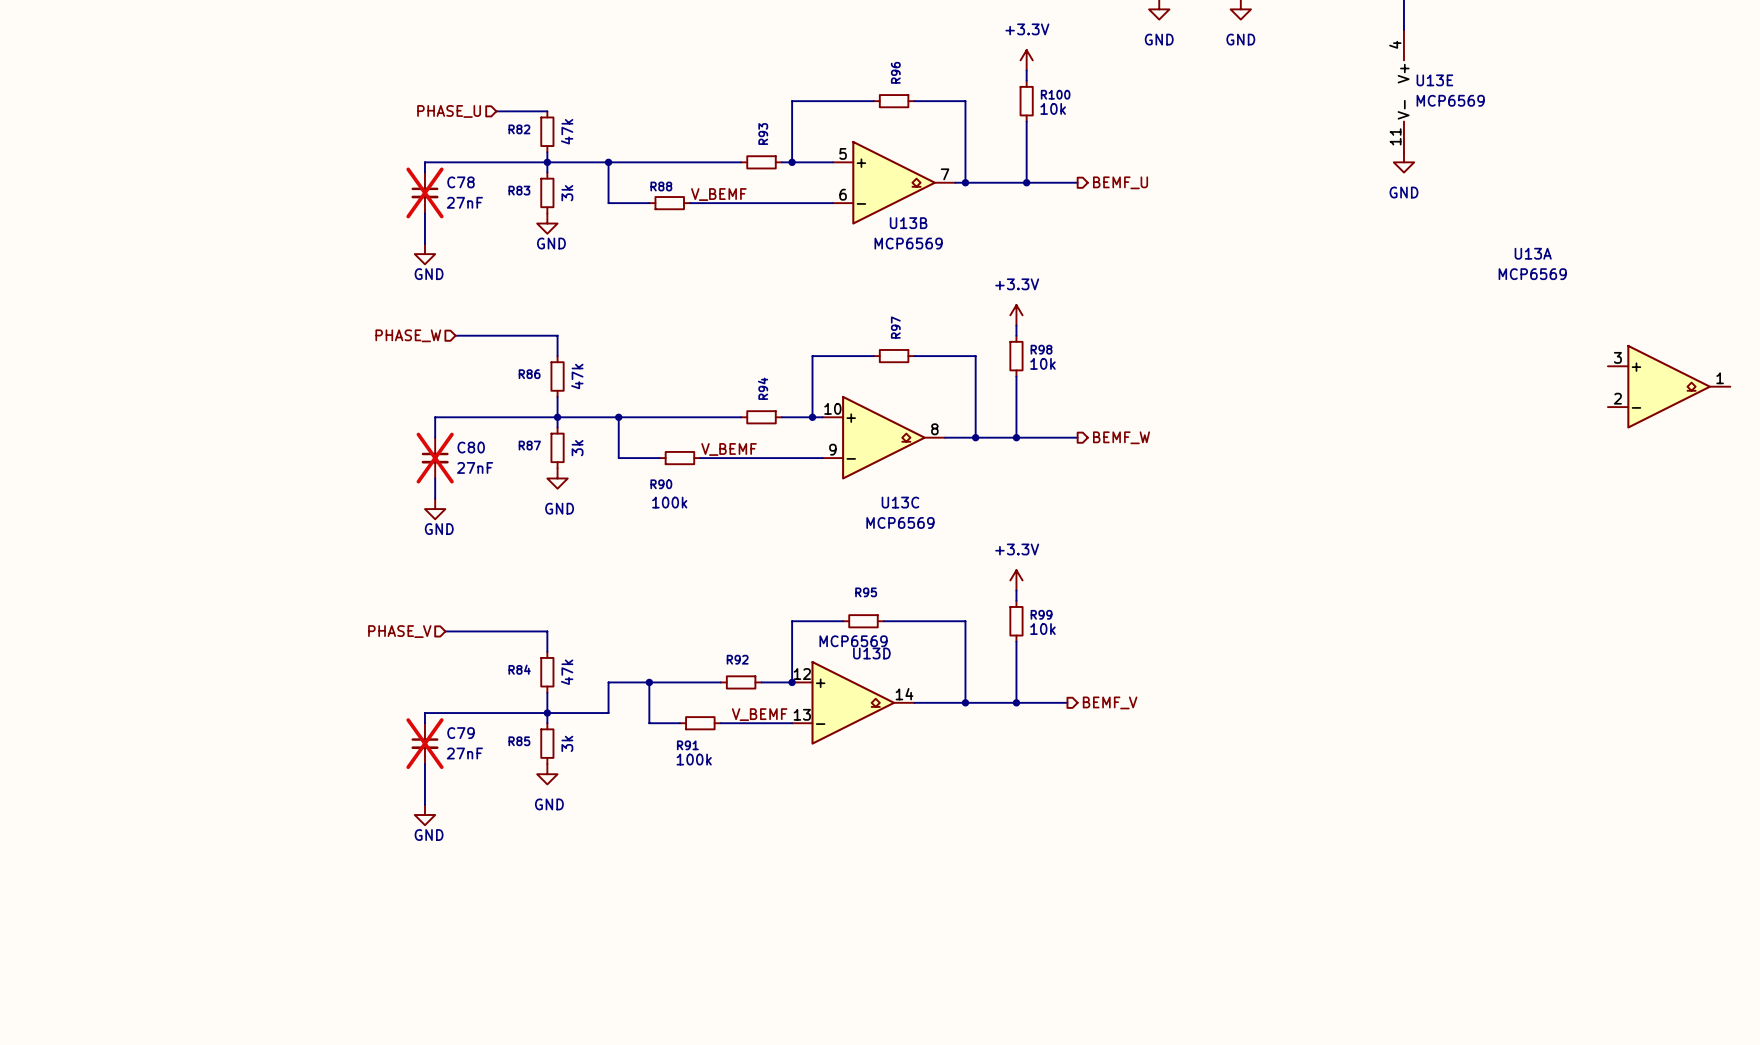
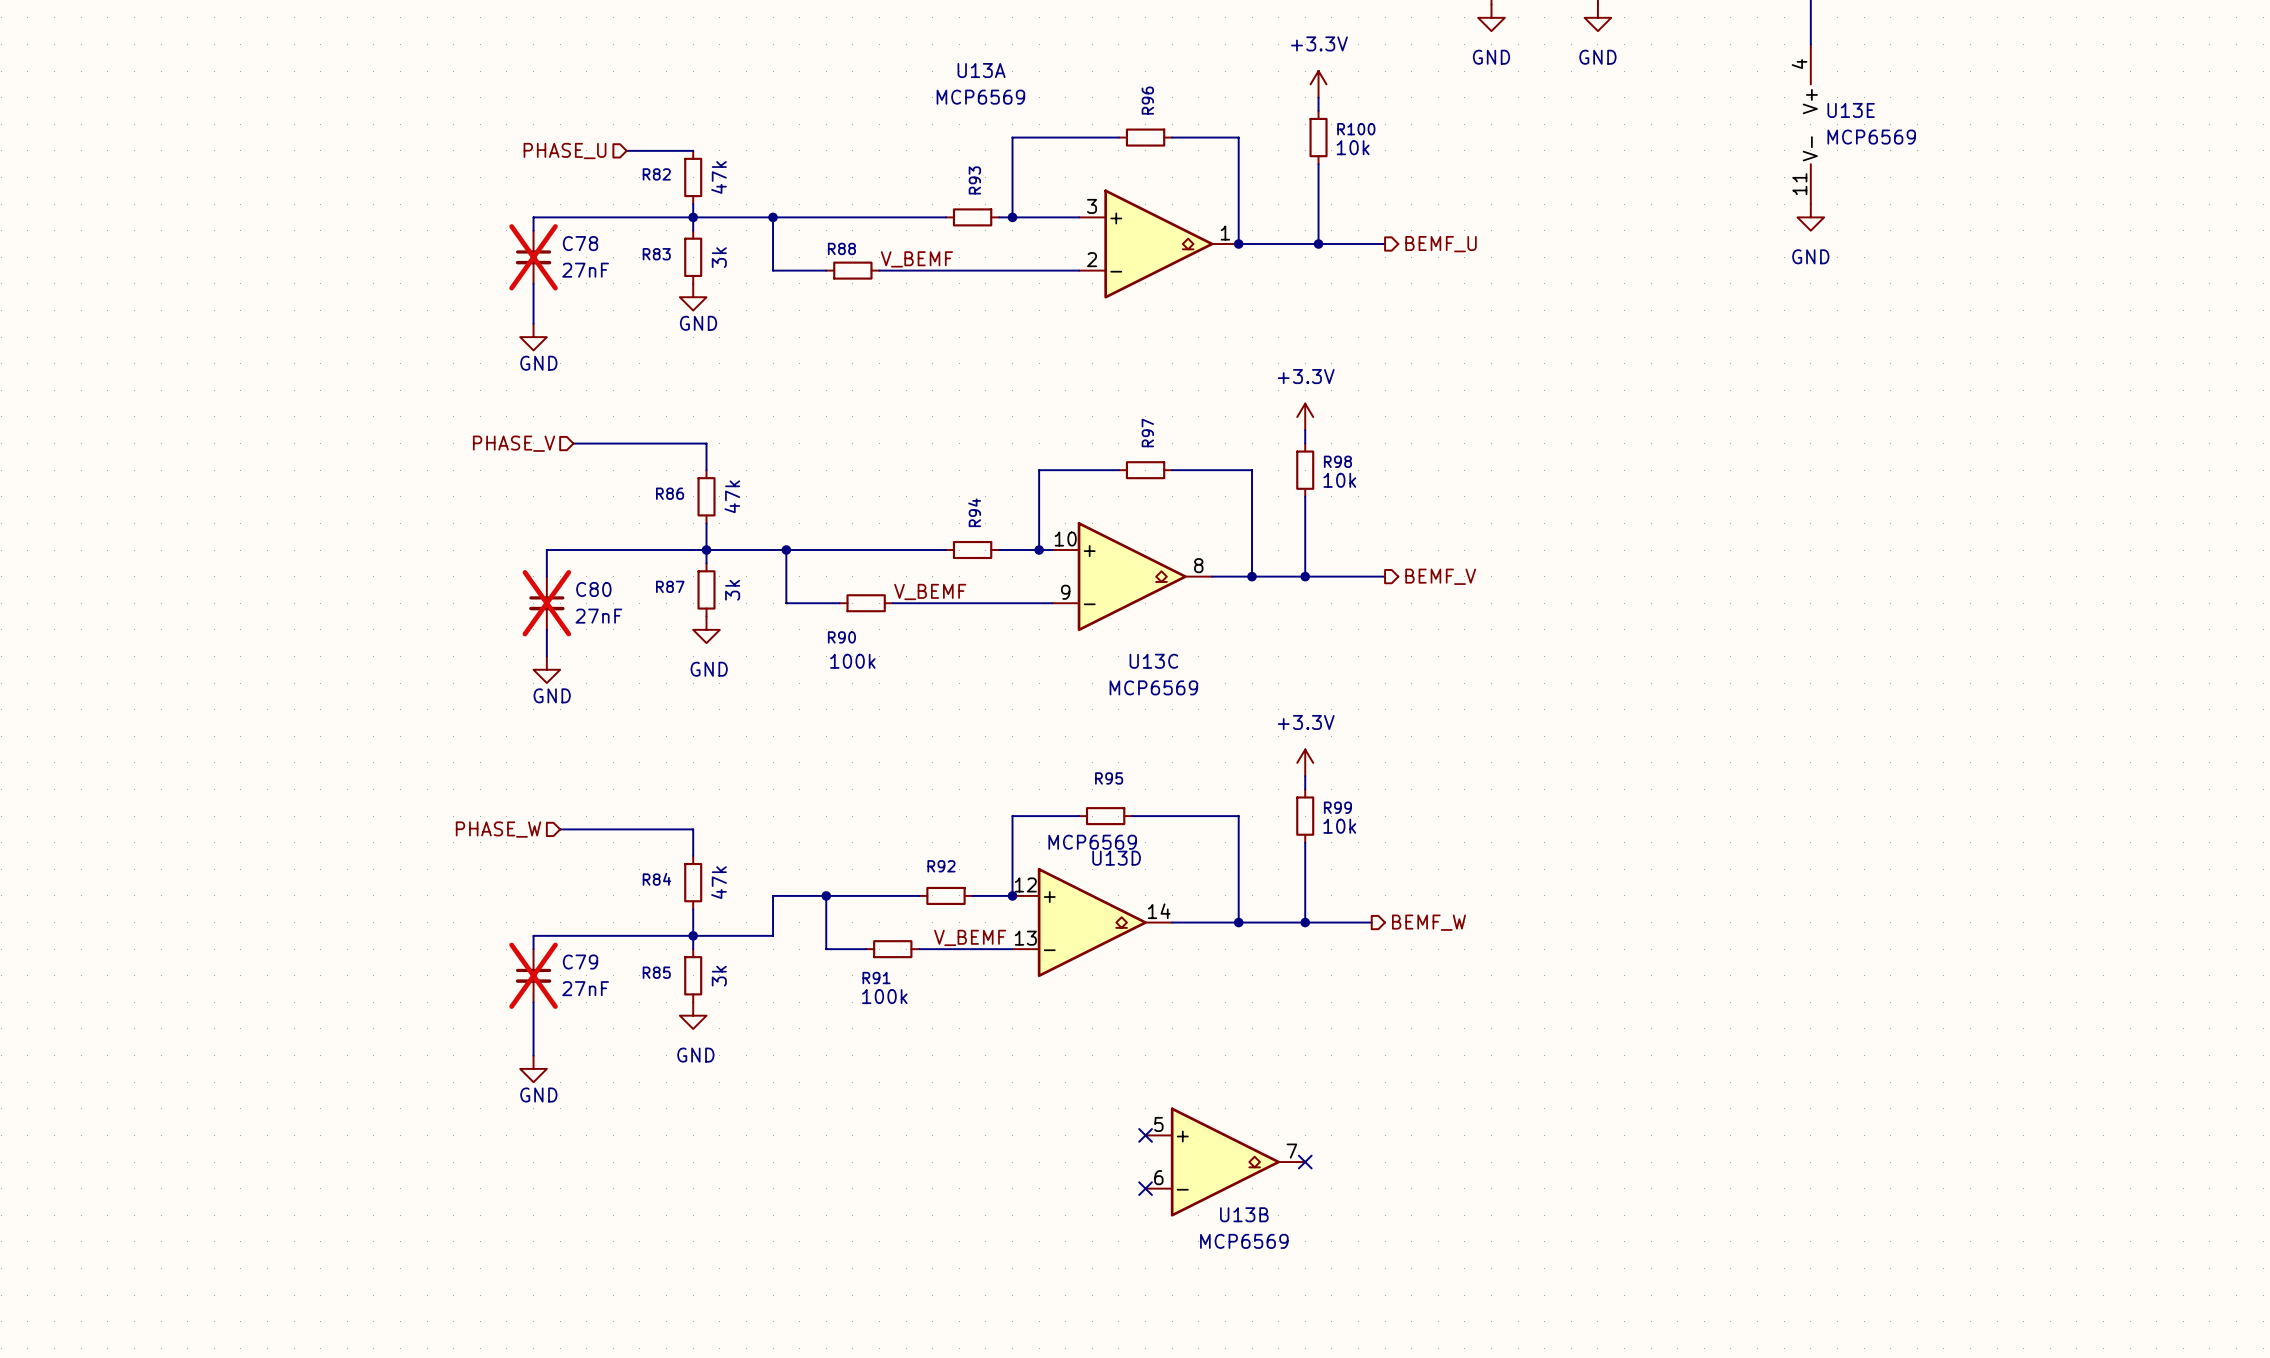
U13B position: (894, 182) -> (1225, 1162)
hierarchical label: PHASE_W (408, 335) -> PHASE_V (514, 443)
U13A position: (1669, 386) -> (1158, 244)
hierarchical label: BEMF_W (1121, 437) -> BEMF_V (1440, 576)
hierarchical label: PHASE_V (399, 631) -> PHASE_W (498, 829)
hierarchical label: BEMF_V (1110, 702) -> BEMF_W (1428, 922)
no-connect mark: none -> (1145, 1135)
no-connect mark: none -> (1305, 1162)
no-connect mark: none -> (1145, 1188)

